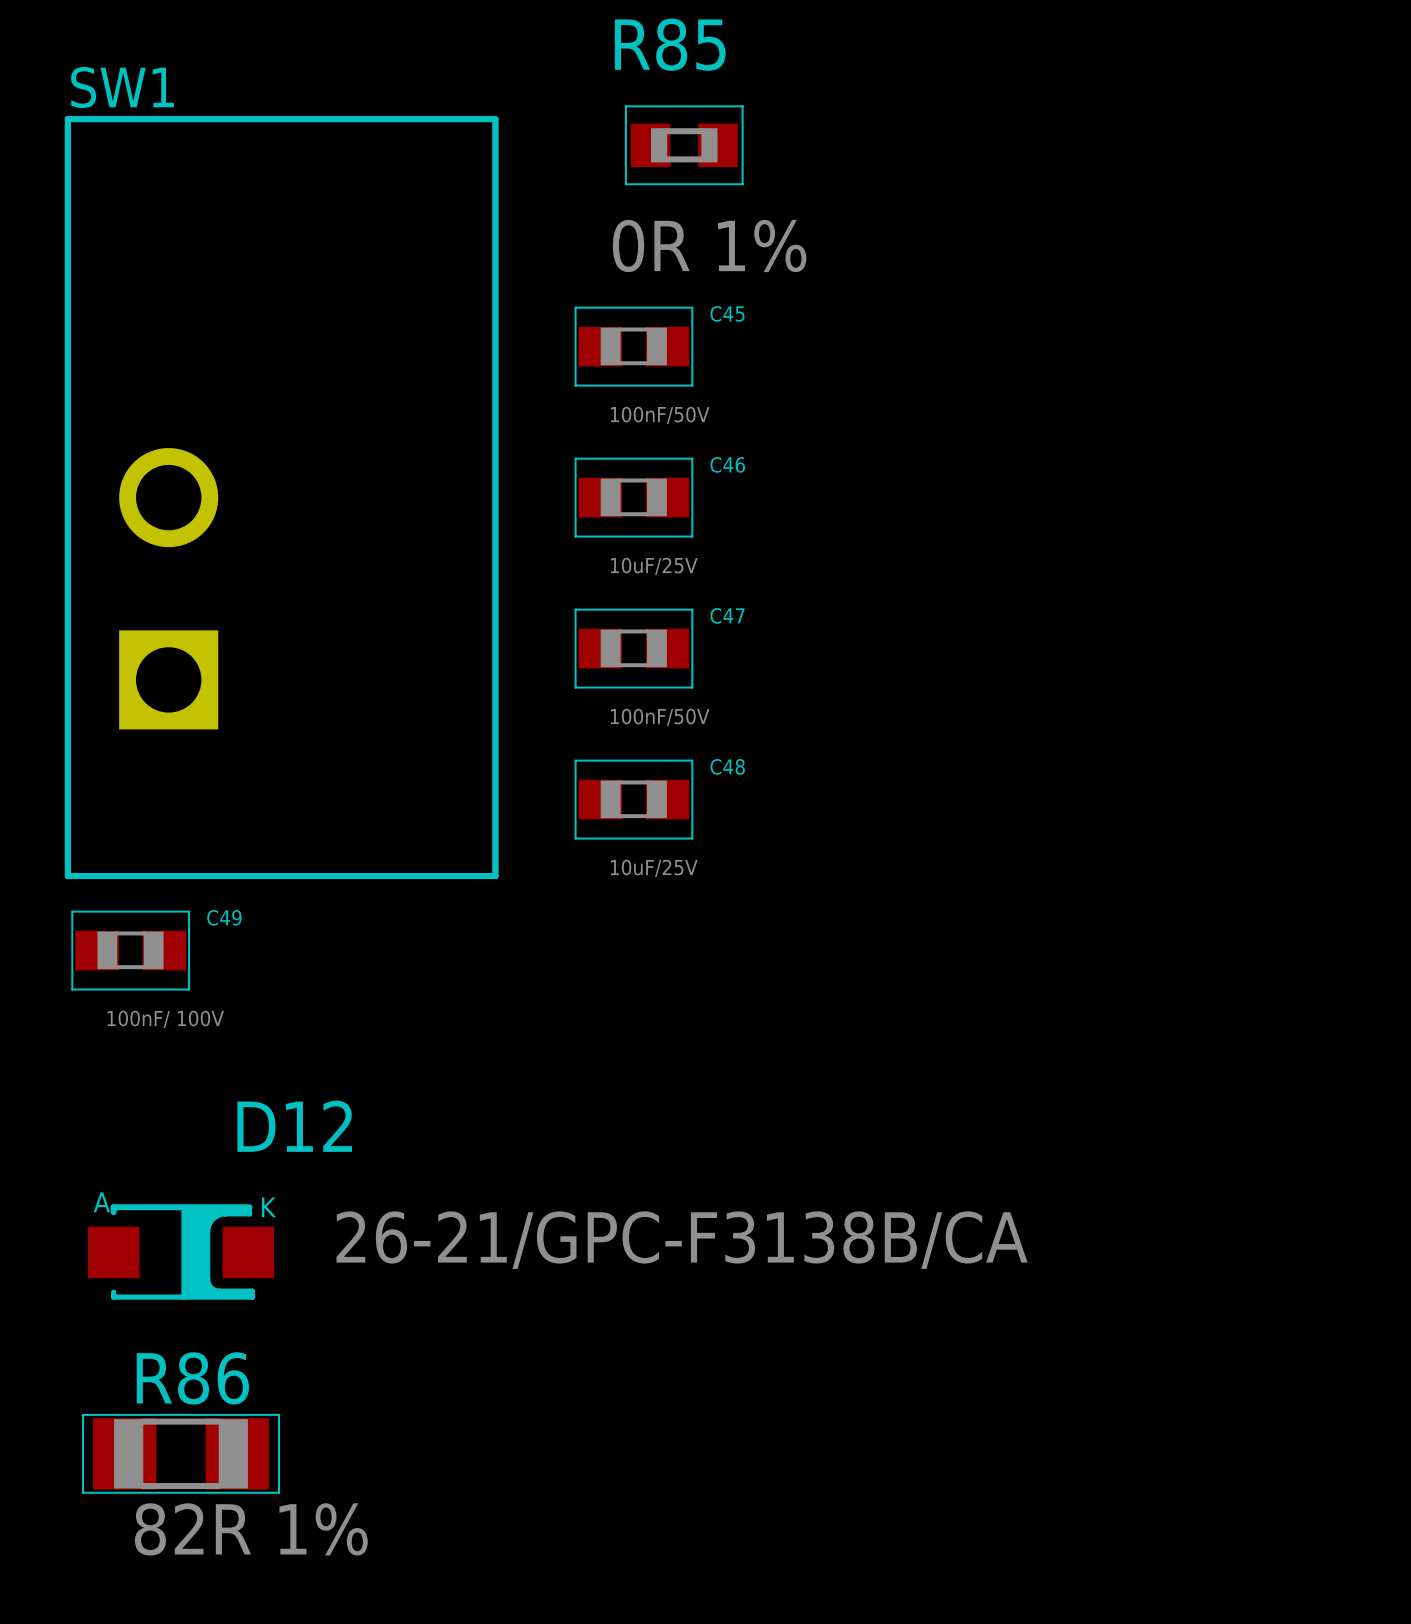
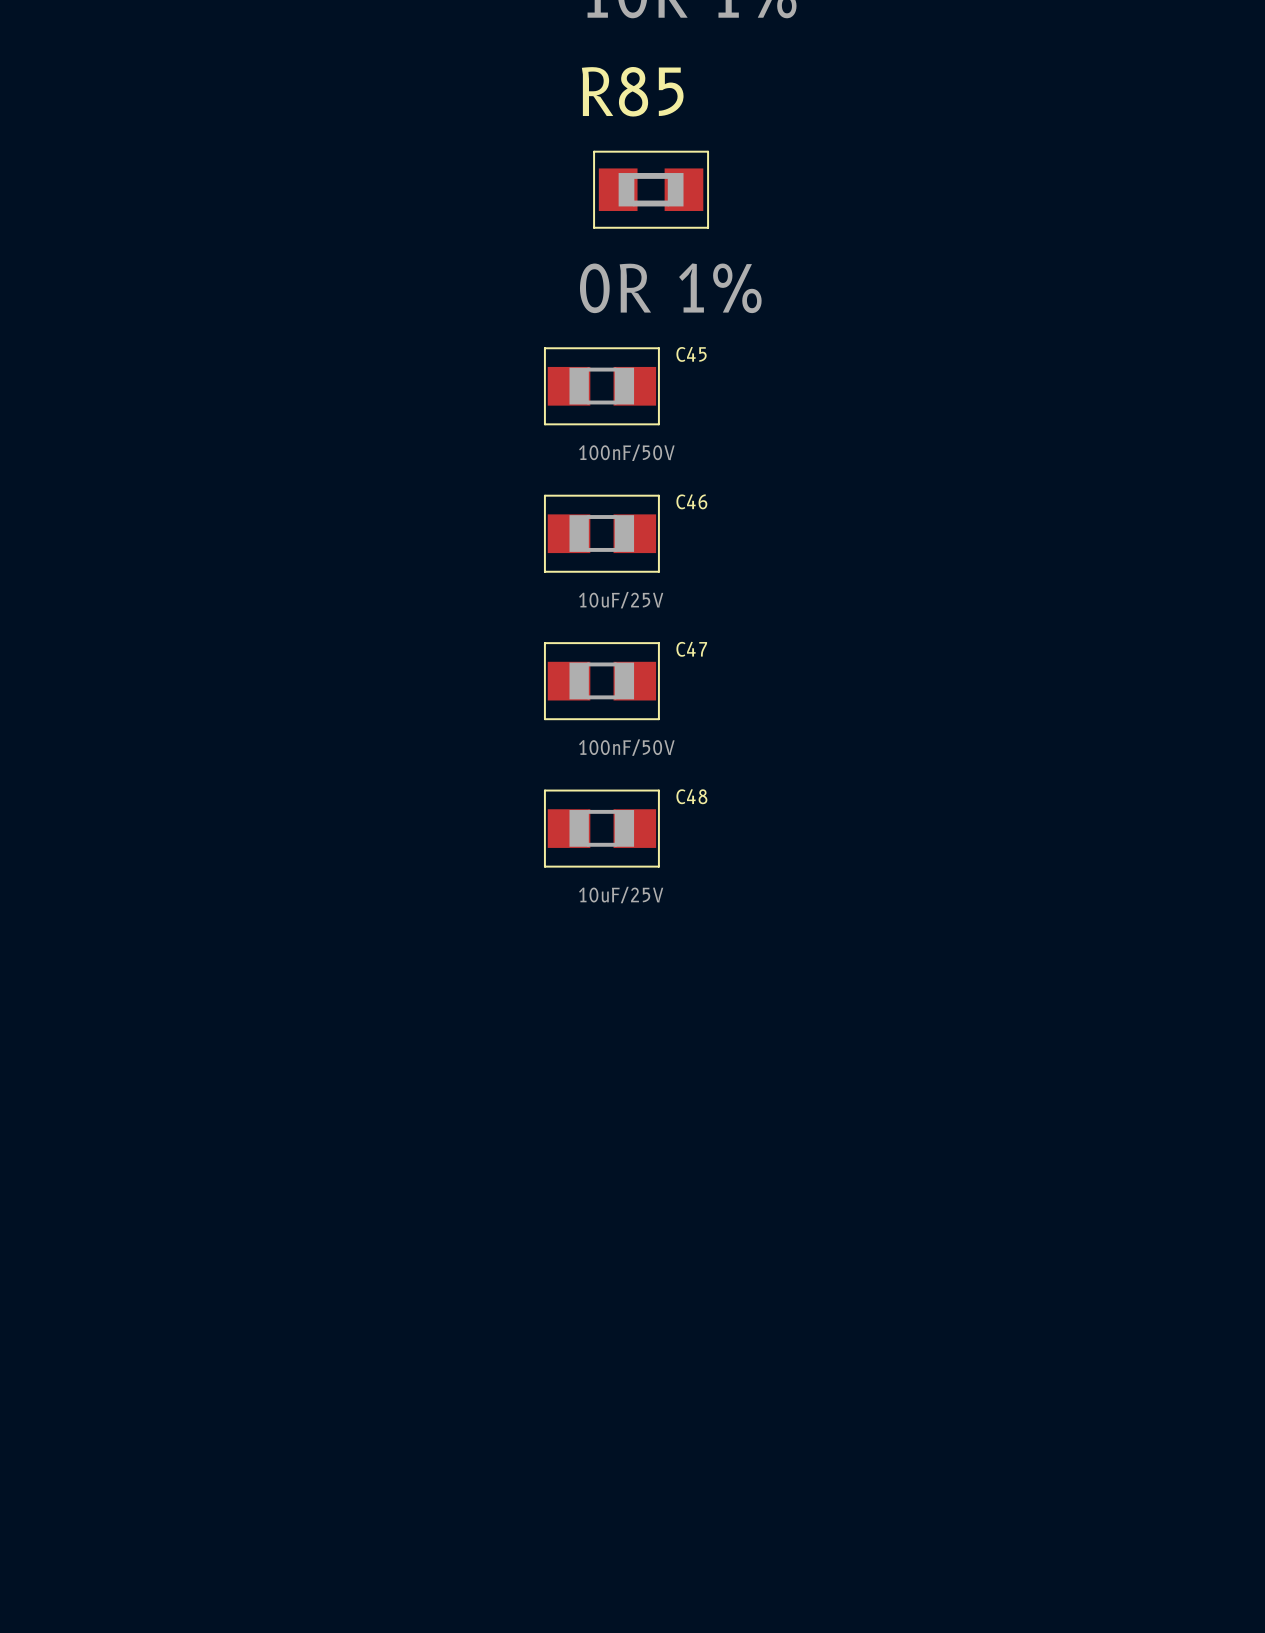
SW1: (281, 497) -> none
C49: 100nF/ 100V (130, 950) -> none
D12: 26-21/GPC-F3138B/CA (180, 1251) -> none
R86: 82R 1% (180, 1453) -> none

